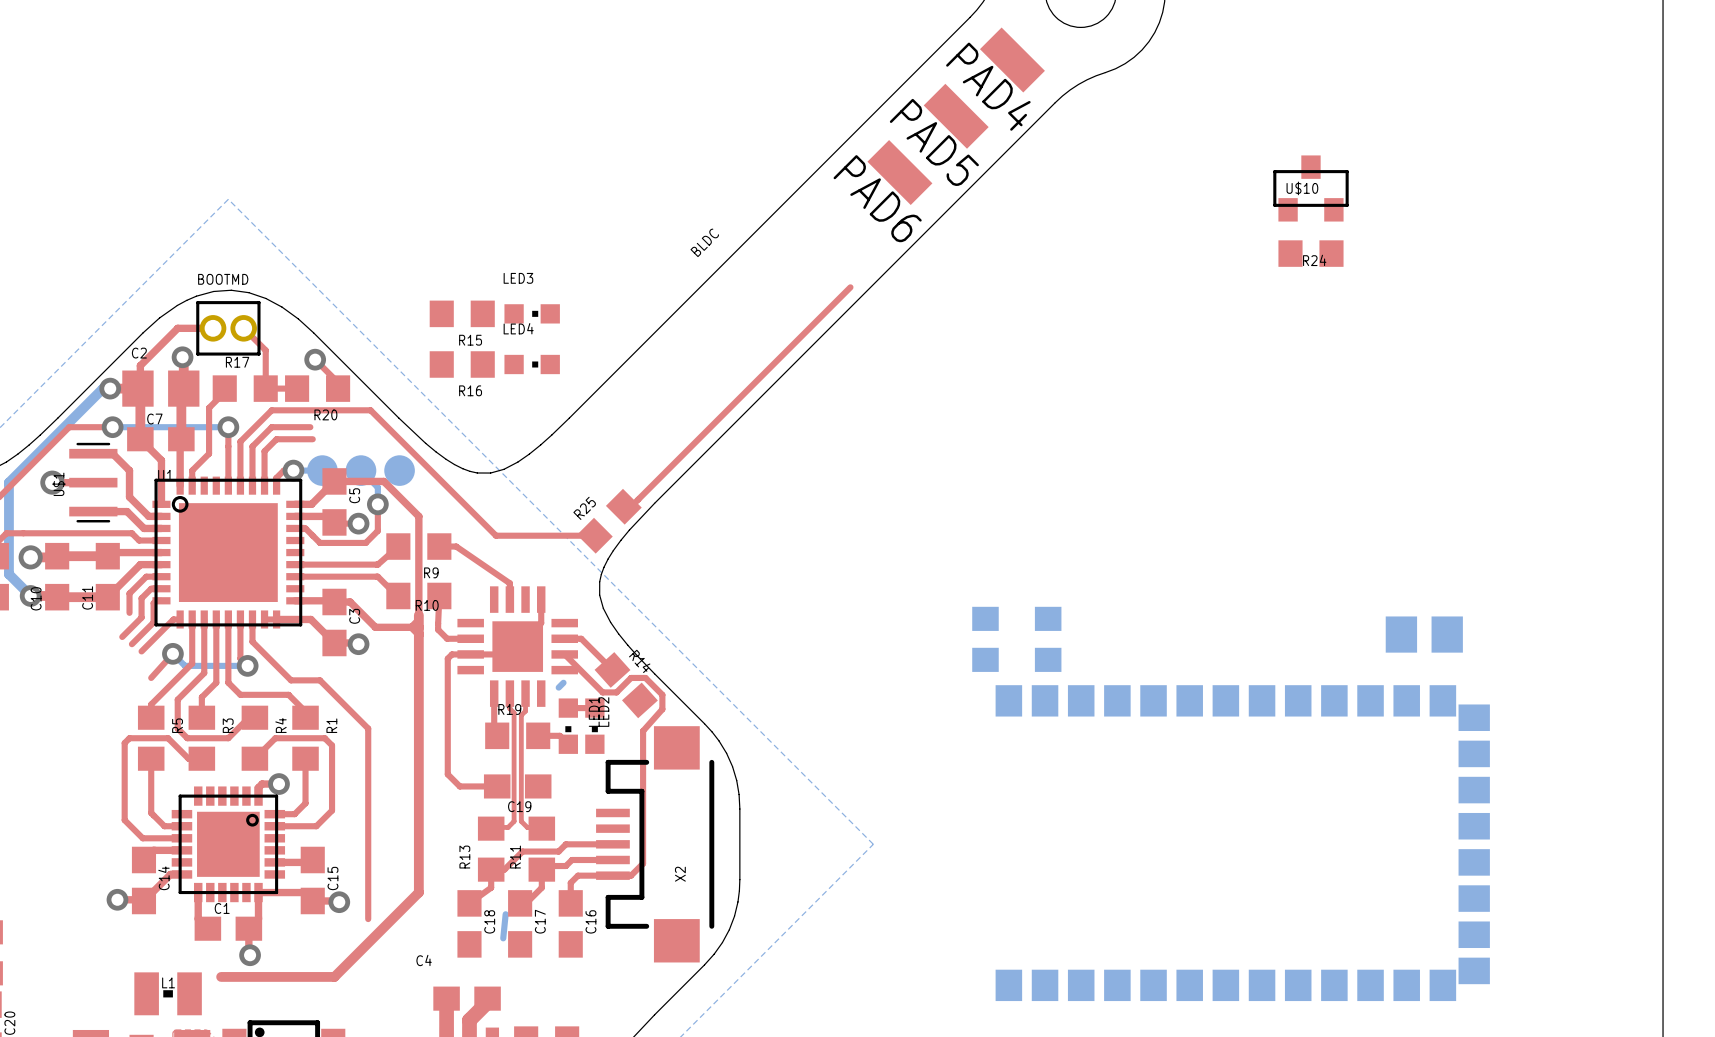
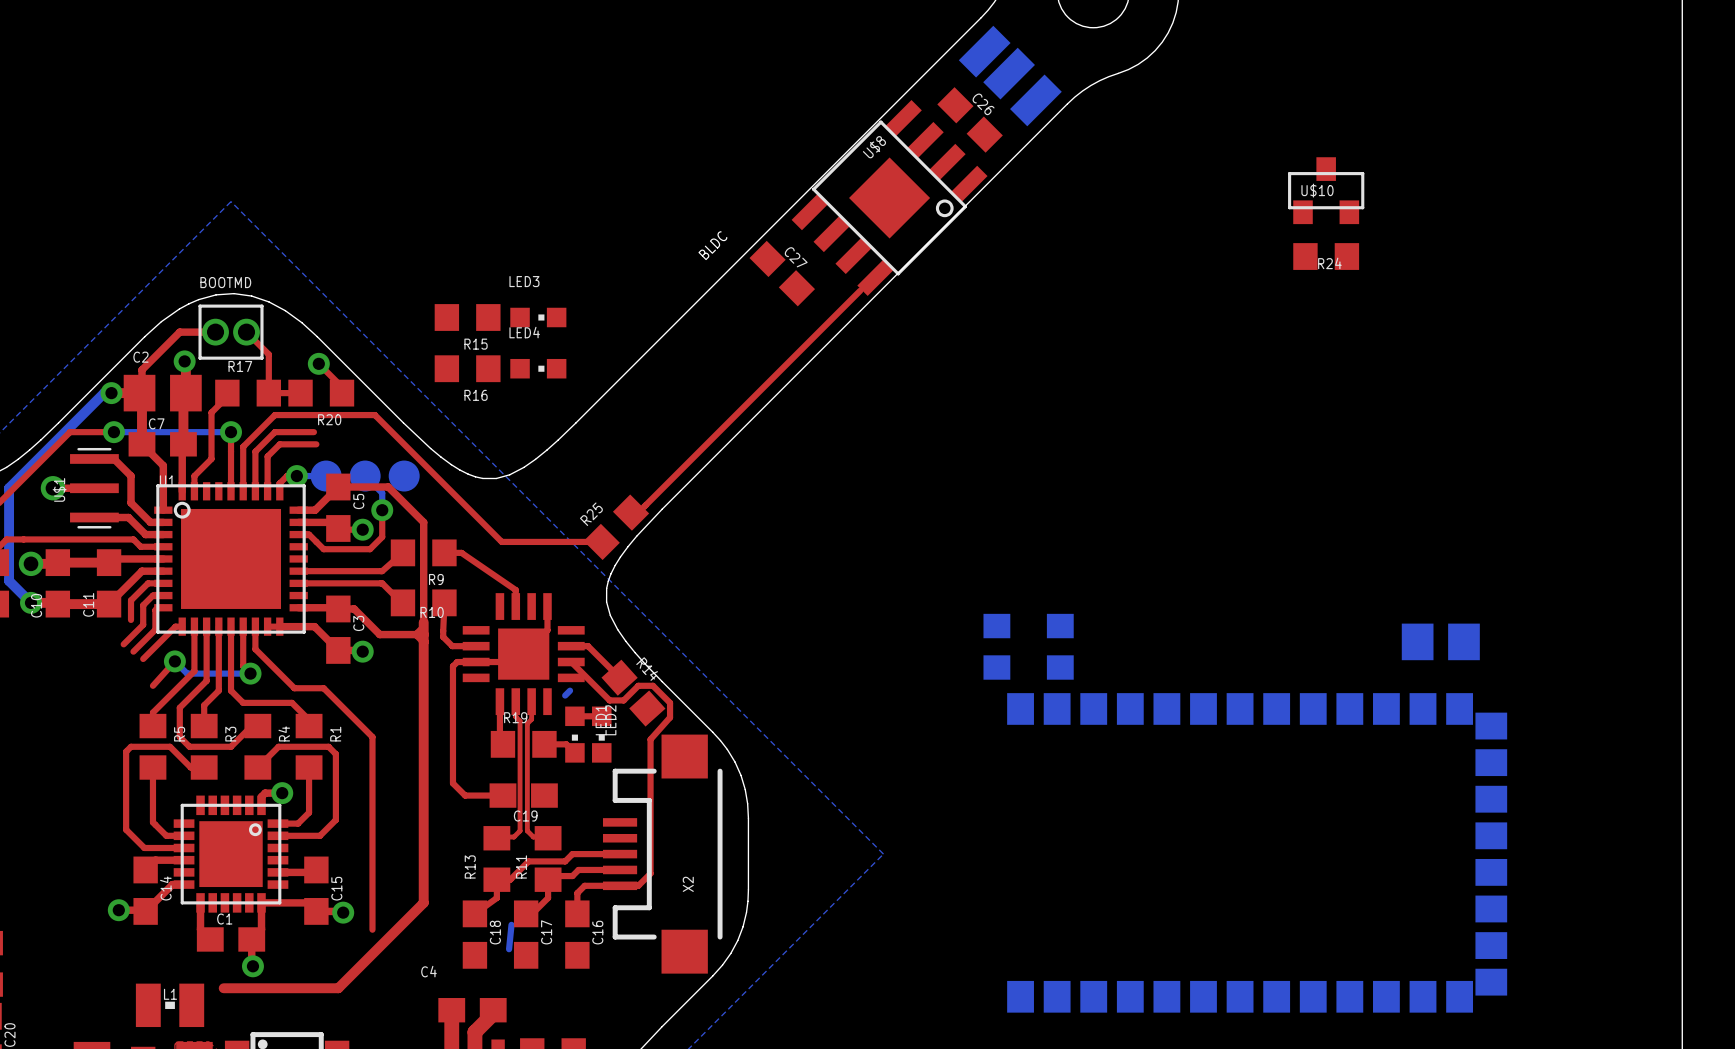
part: none -> (984, 51)
PAD4: (1012, 60) -> none
part: none -> (1009, 73)
part: none -> (1035, 100)
PAD5: (956, 116) -> none
C26: none -> (970, 119)
PAD6: (899, 172) -> none
U$8: none -> (889, 197)
C27: none -> (782, 273)

